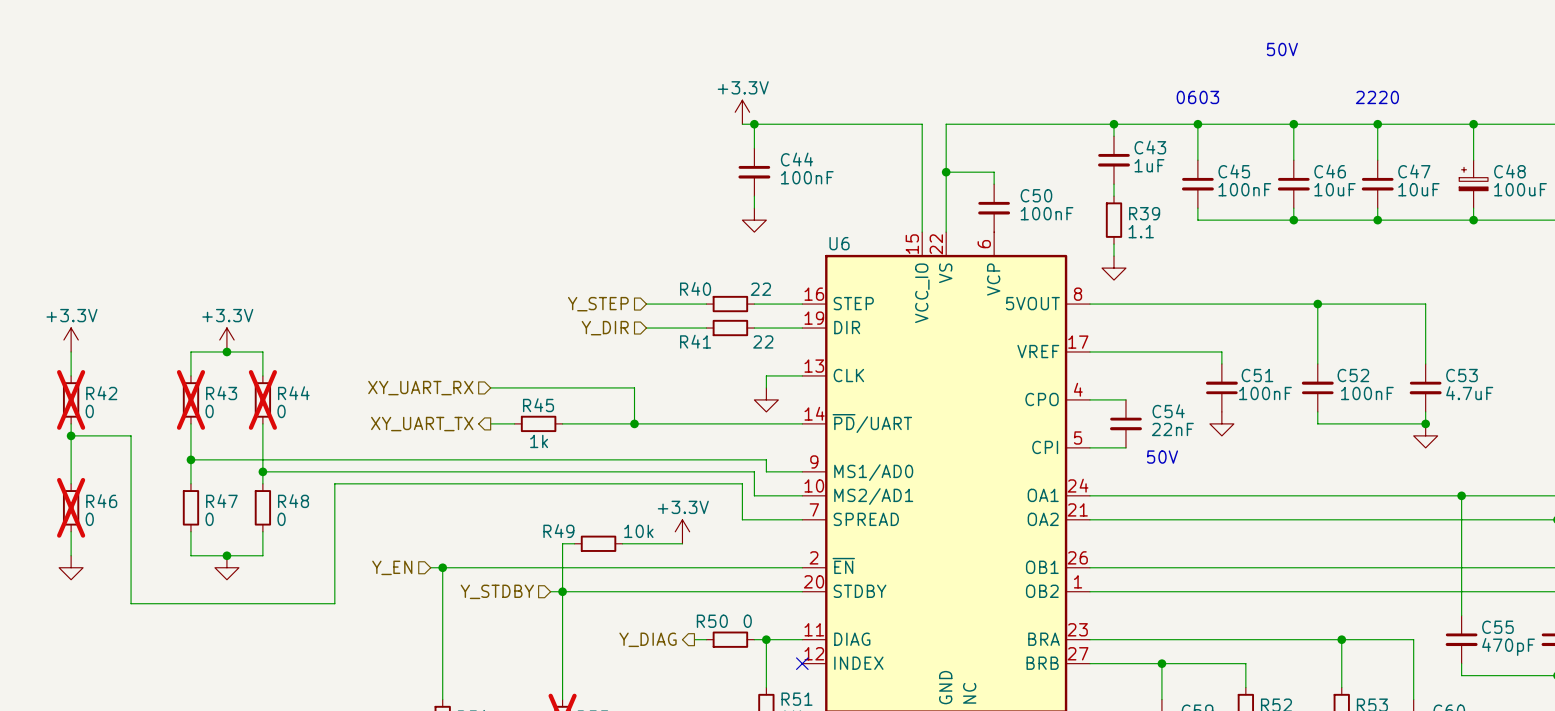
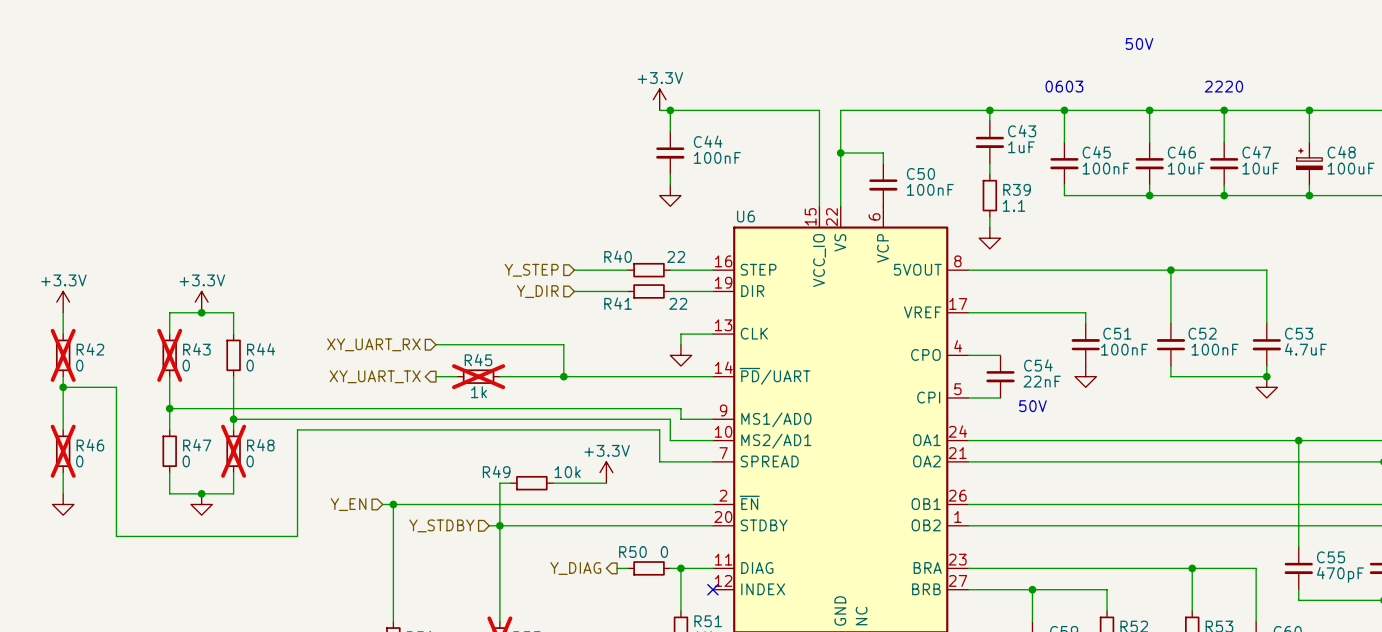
R44 do-not-place cross: (262, 399) -> none
R45 do-not-place cross: none -> (478, 376)
R48 do-not-place cross: none -> (233, 451)

